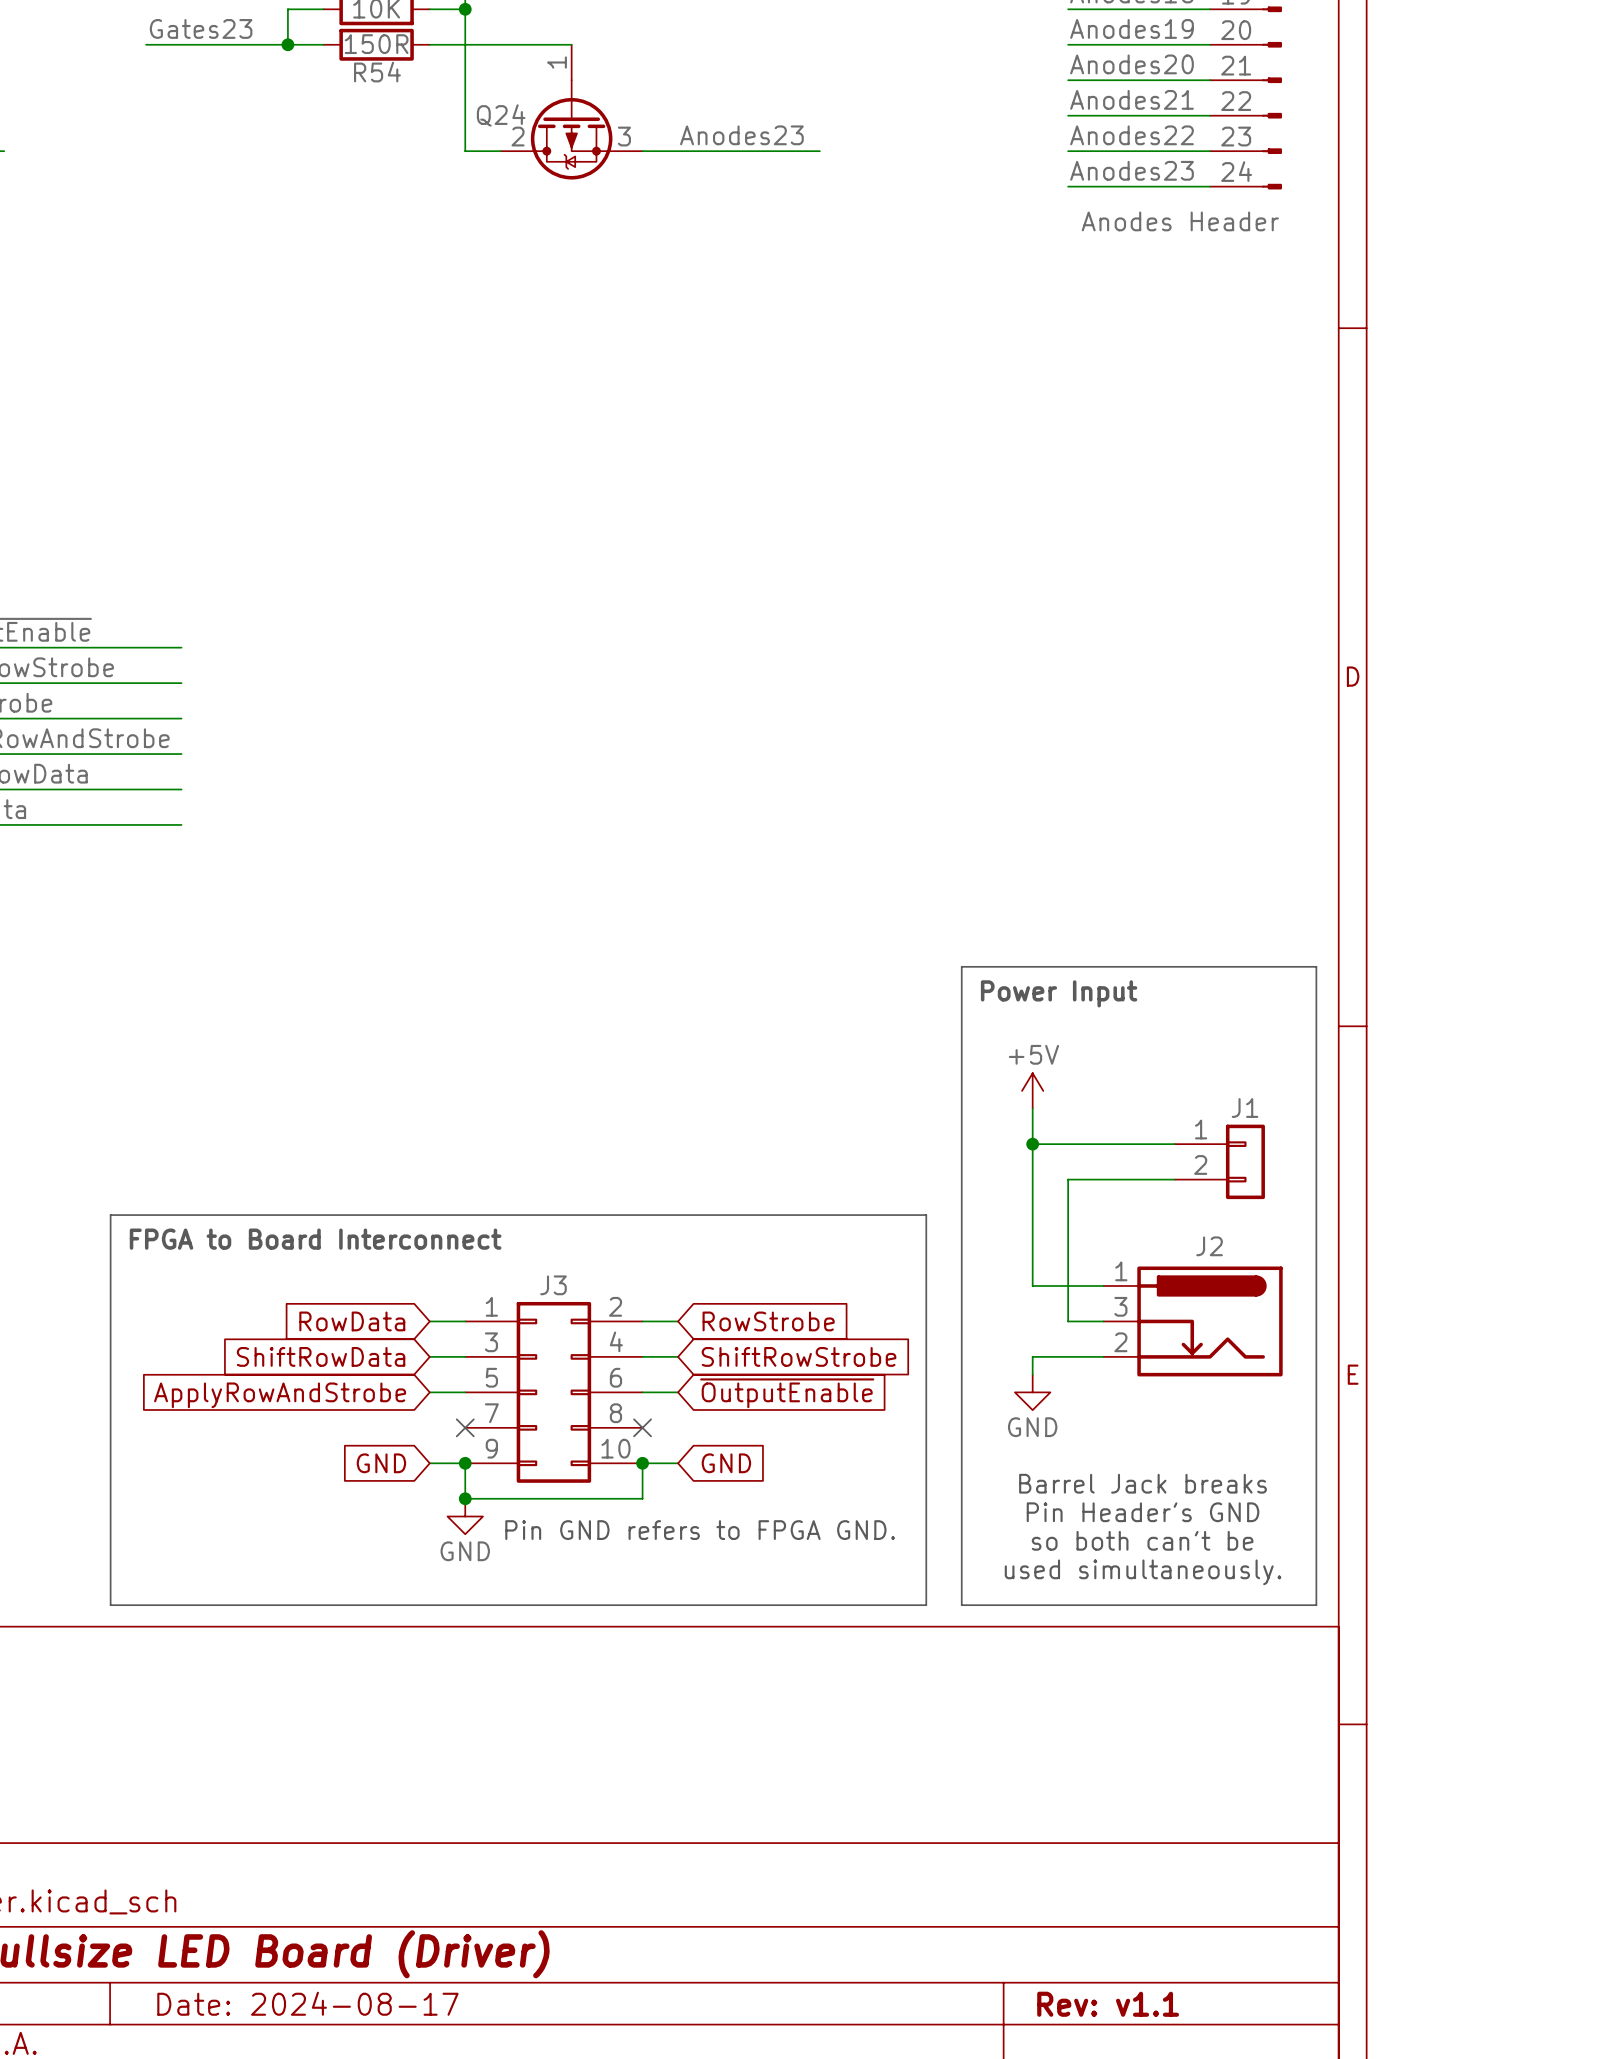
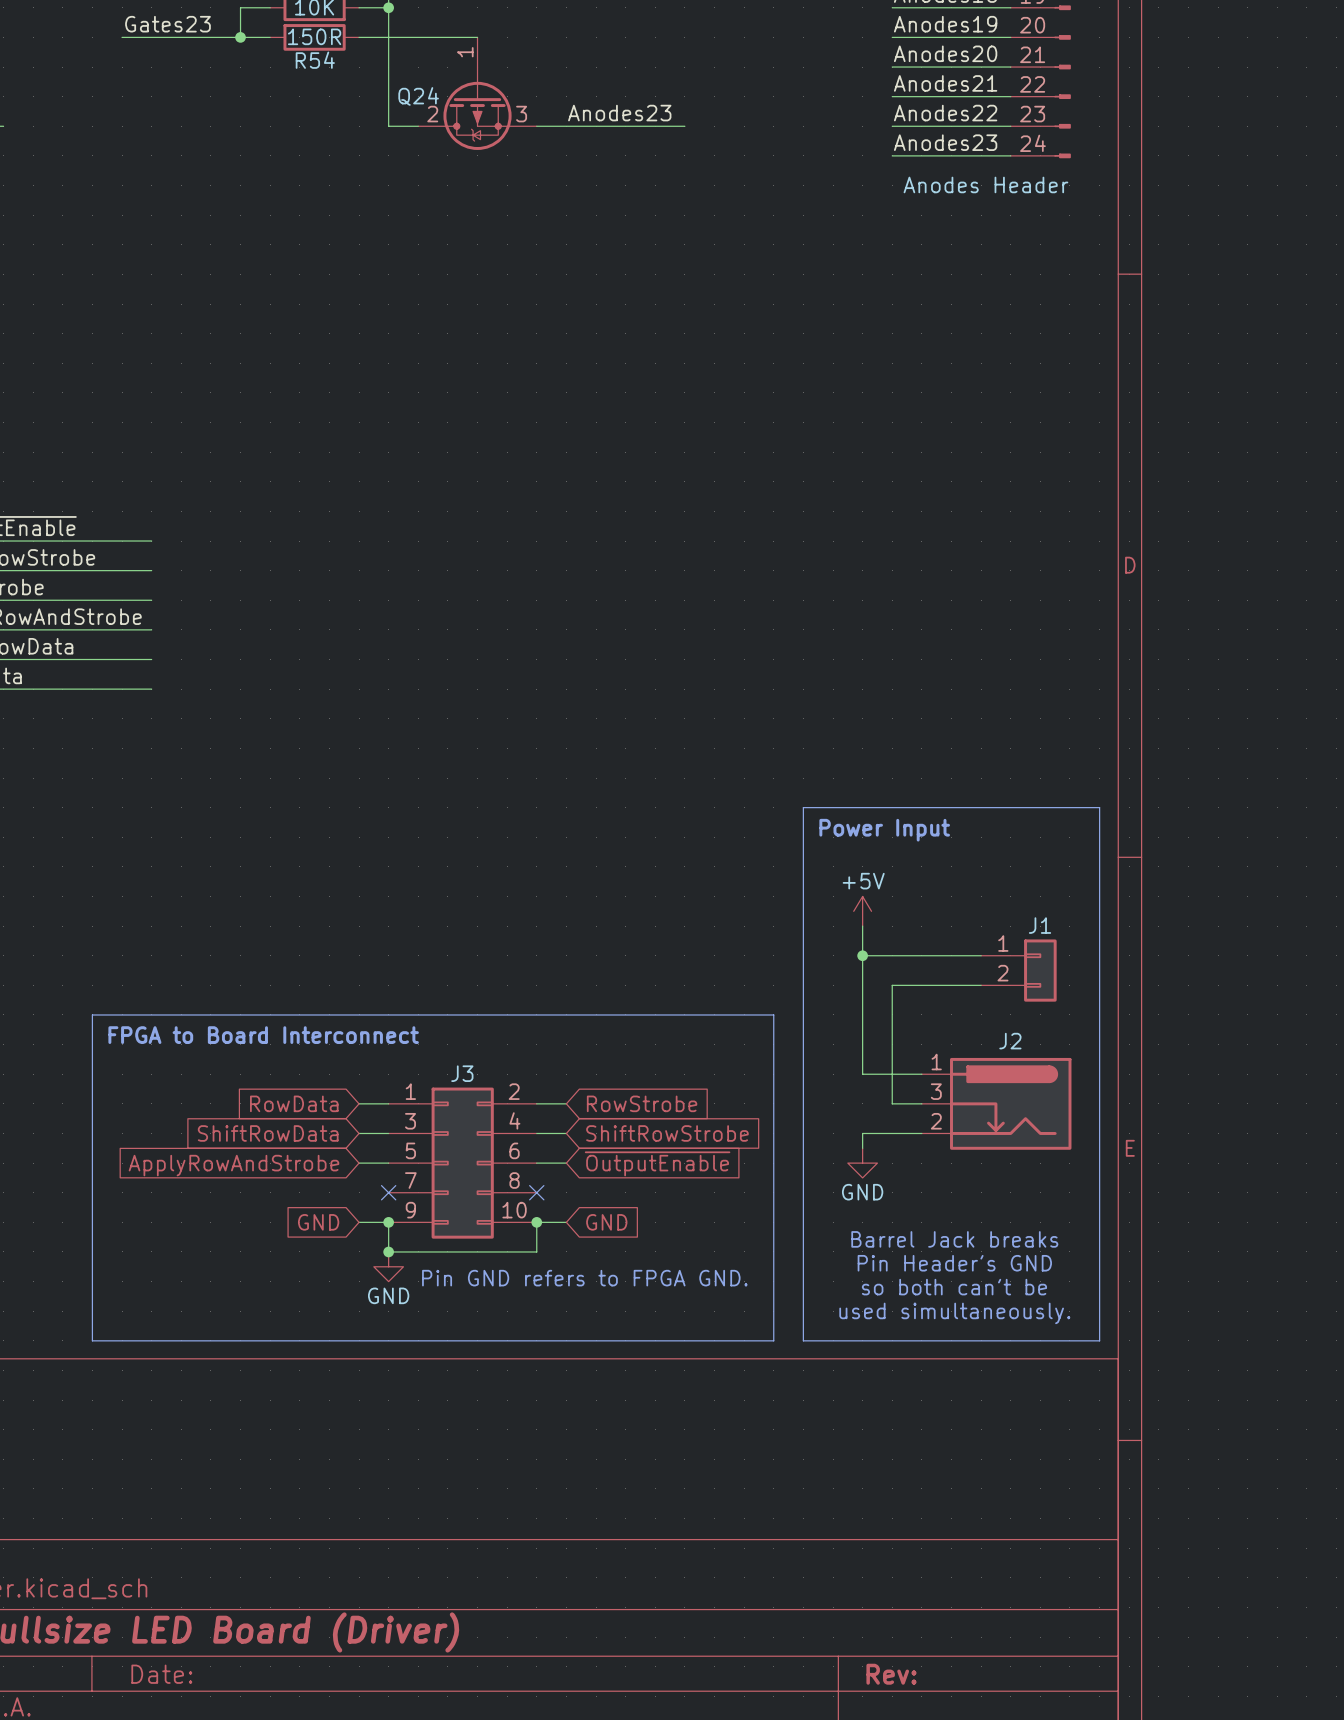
title block: Date: 2024-08-17 (307, 2003) -> Date: (161, 1674)
title block: Rev: v1.1 (1108, 2004) -> Rev: (891, 1674)

